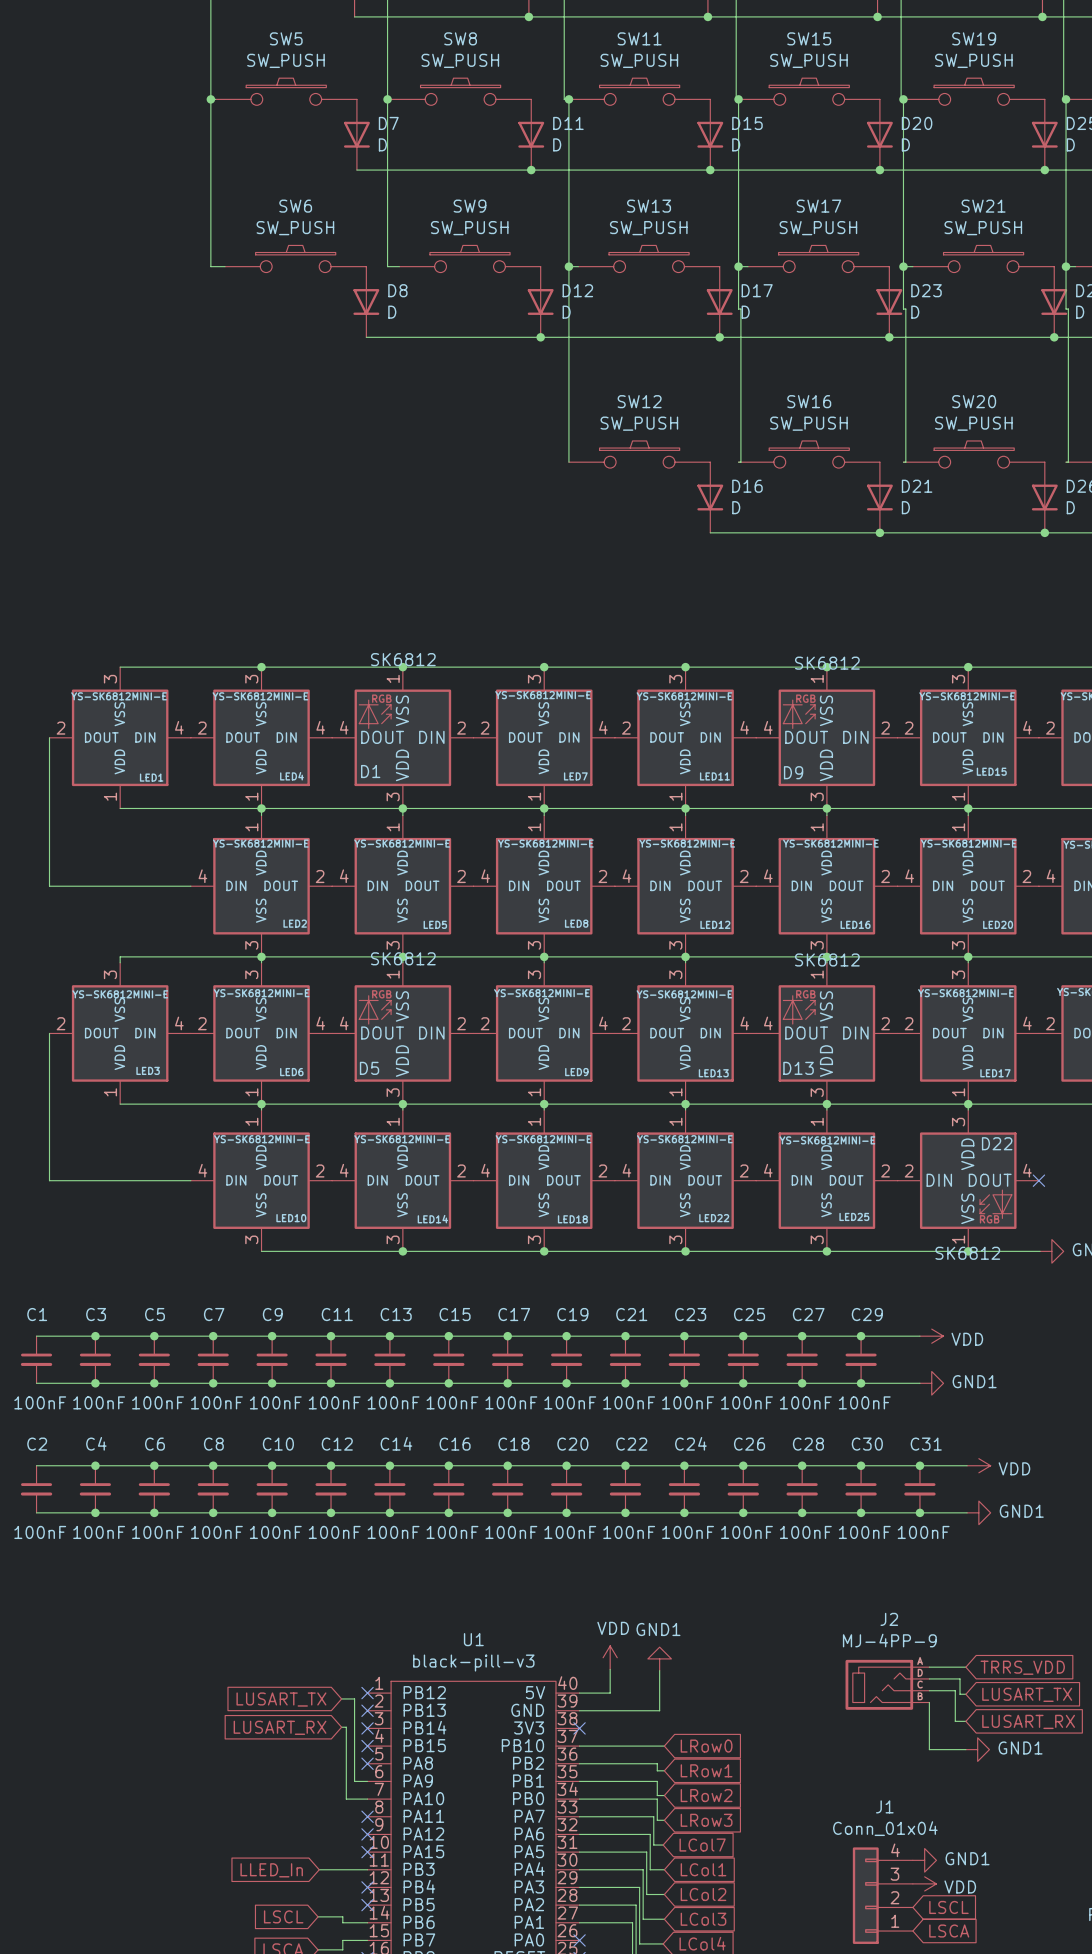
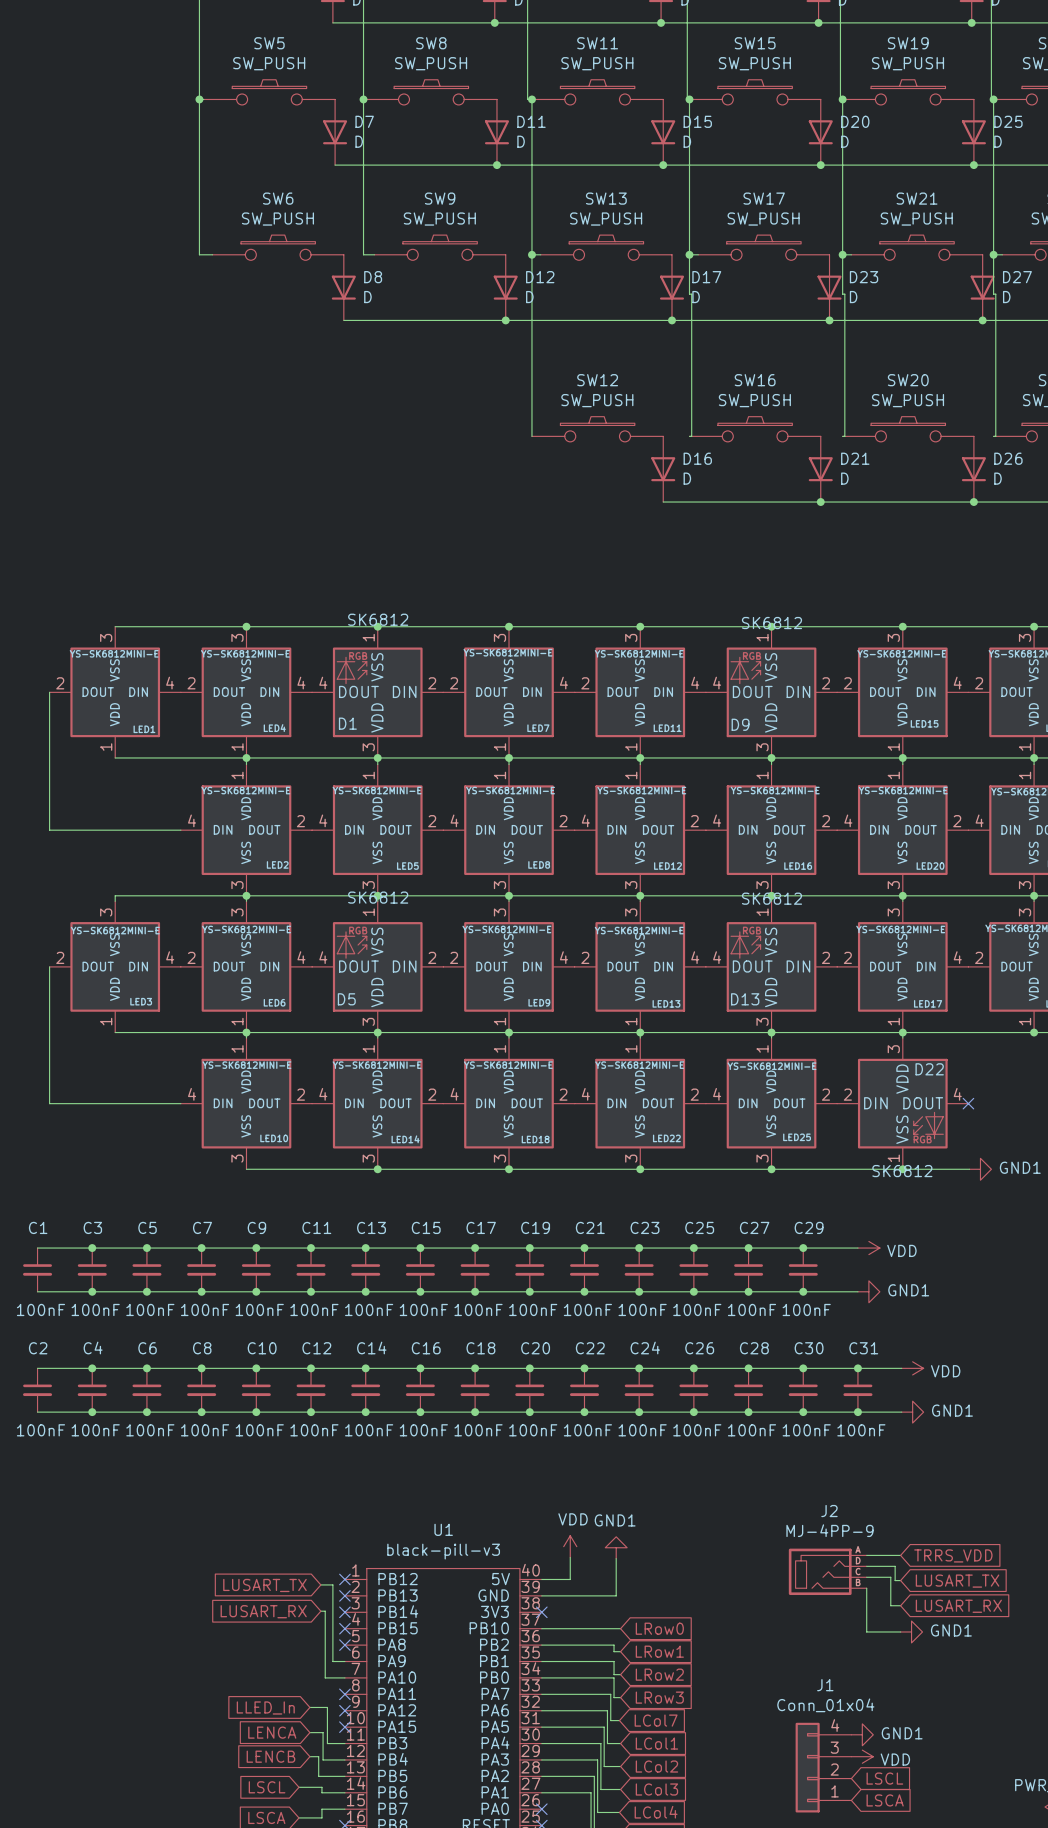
global label: none -> LENCA (272, 1732)
wire: none -> (309, 1732) (323, 1732) (323, 1759) (344, 1759)
wire: (319, 1869) (348, 1869) -> (309, 1707) (327, 1707) (327, 1743)
global label position: LLED_In (271, 1870) -> LLED_In (265, 1707)
global label: none -> LENCB (270, 1756)
wire: none -> (309, 1756) (318, 1756) (318, 1776) (344, 1776)
no-connect mark: (367, 1887) -> none
no-connect mark: (367, 1905) -> none

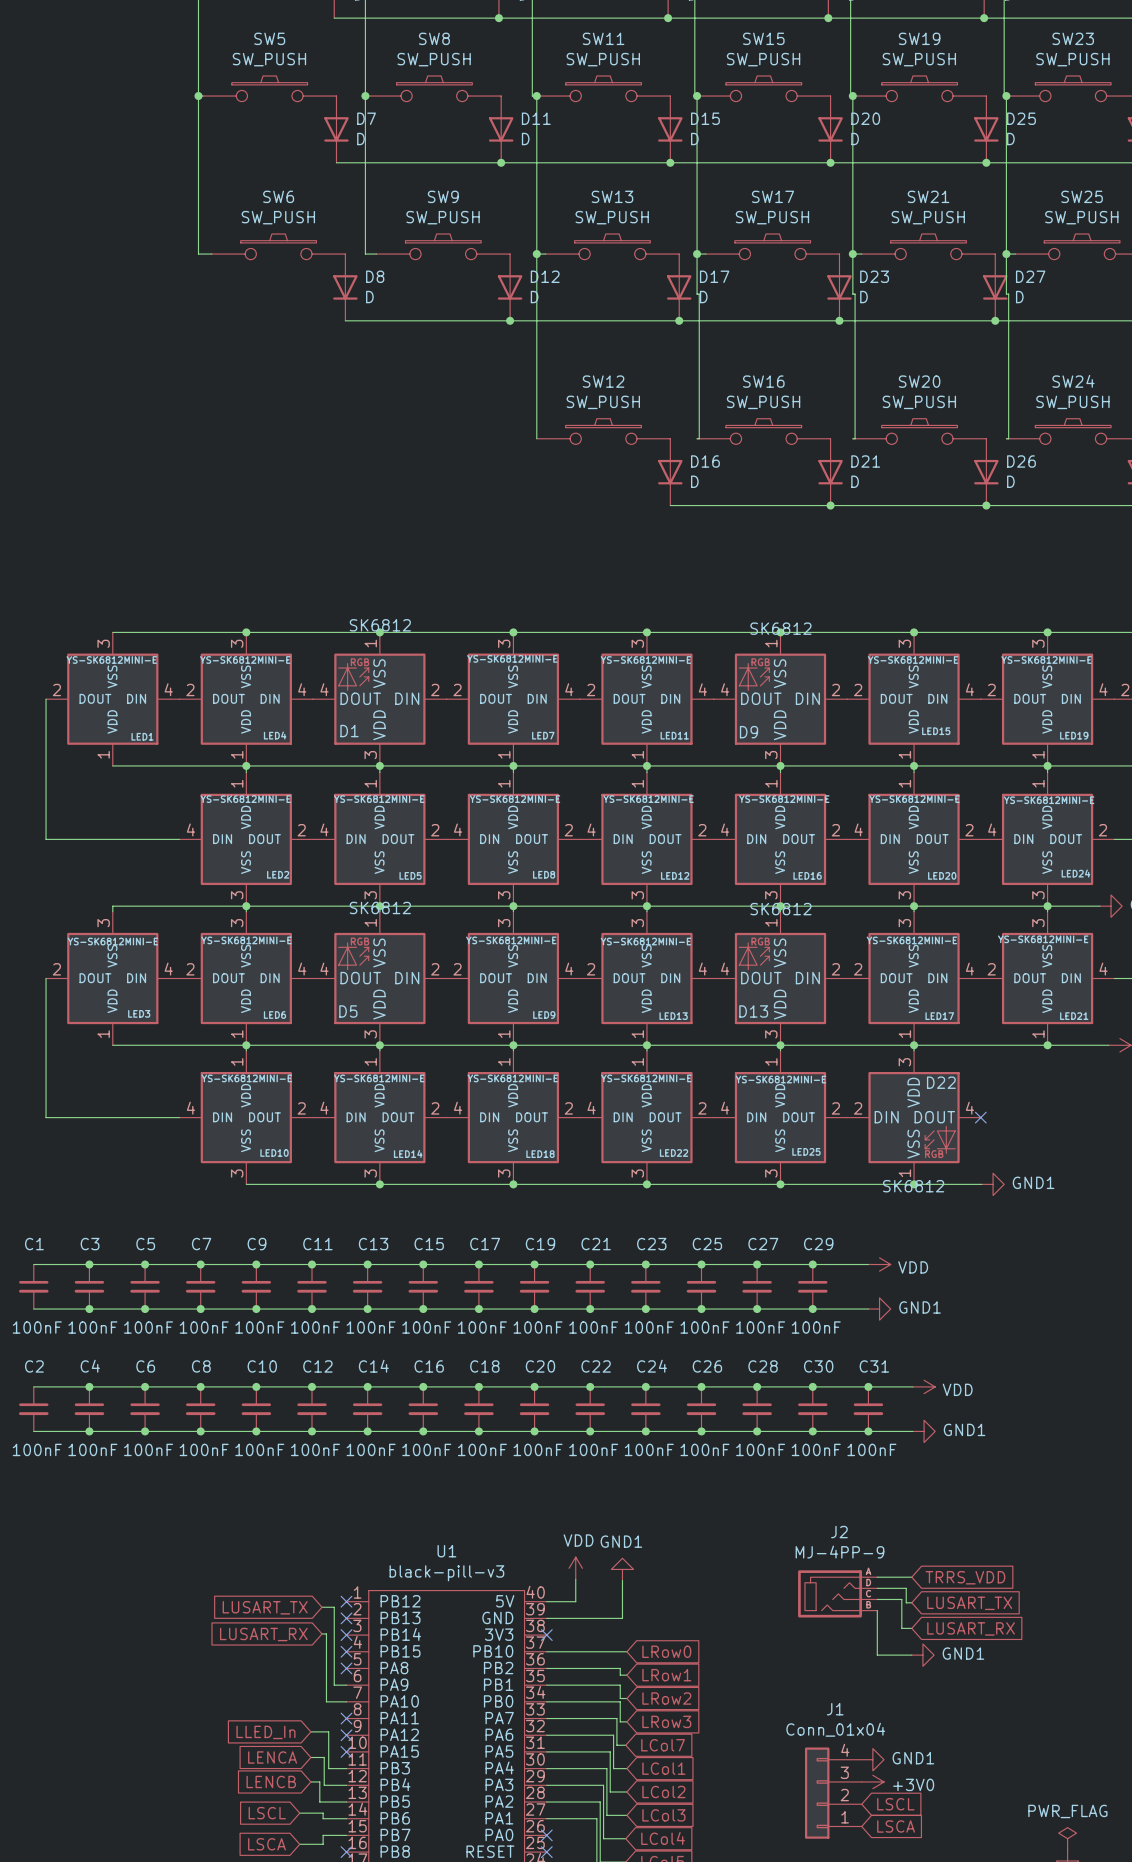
power symbol: VDD (862, 1756) -> +3V0 (872, 1781)

